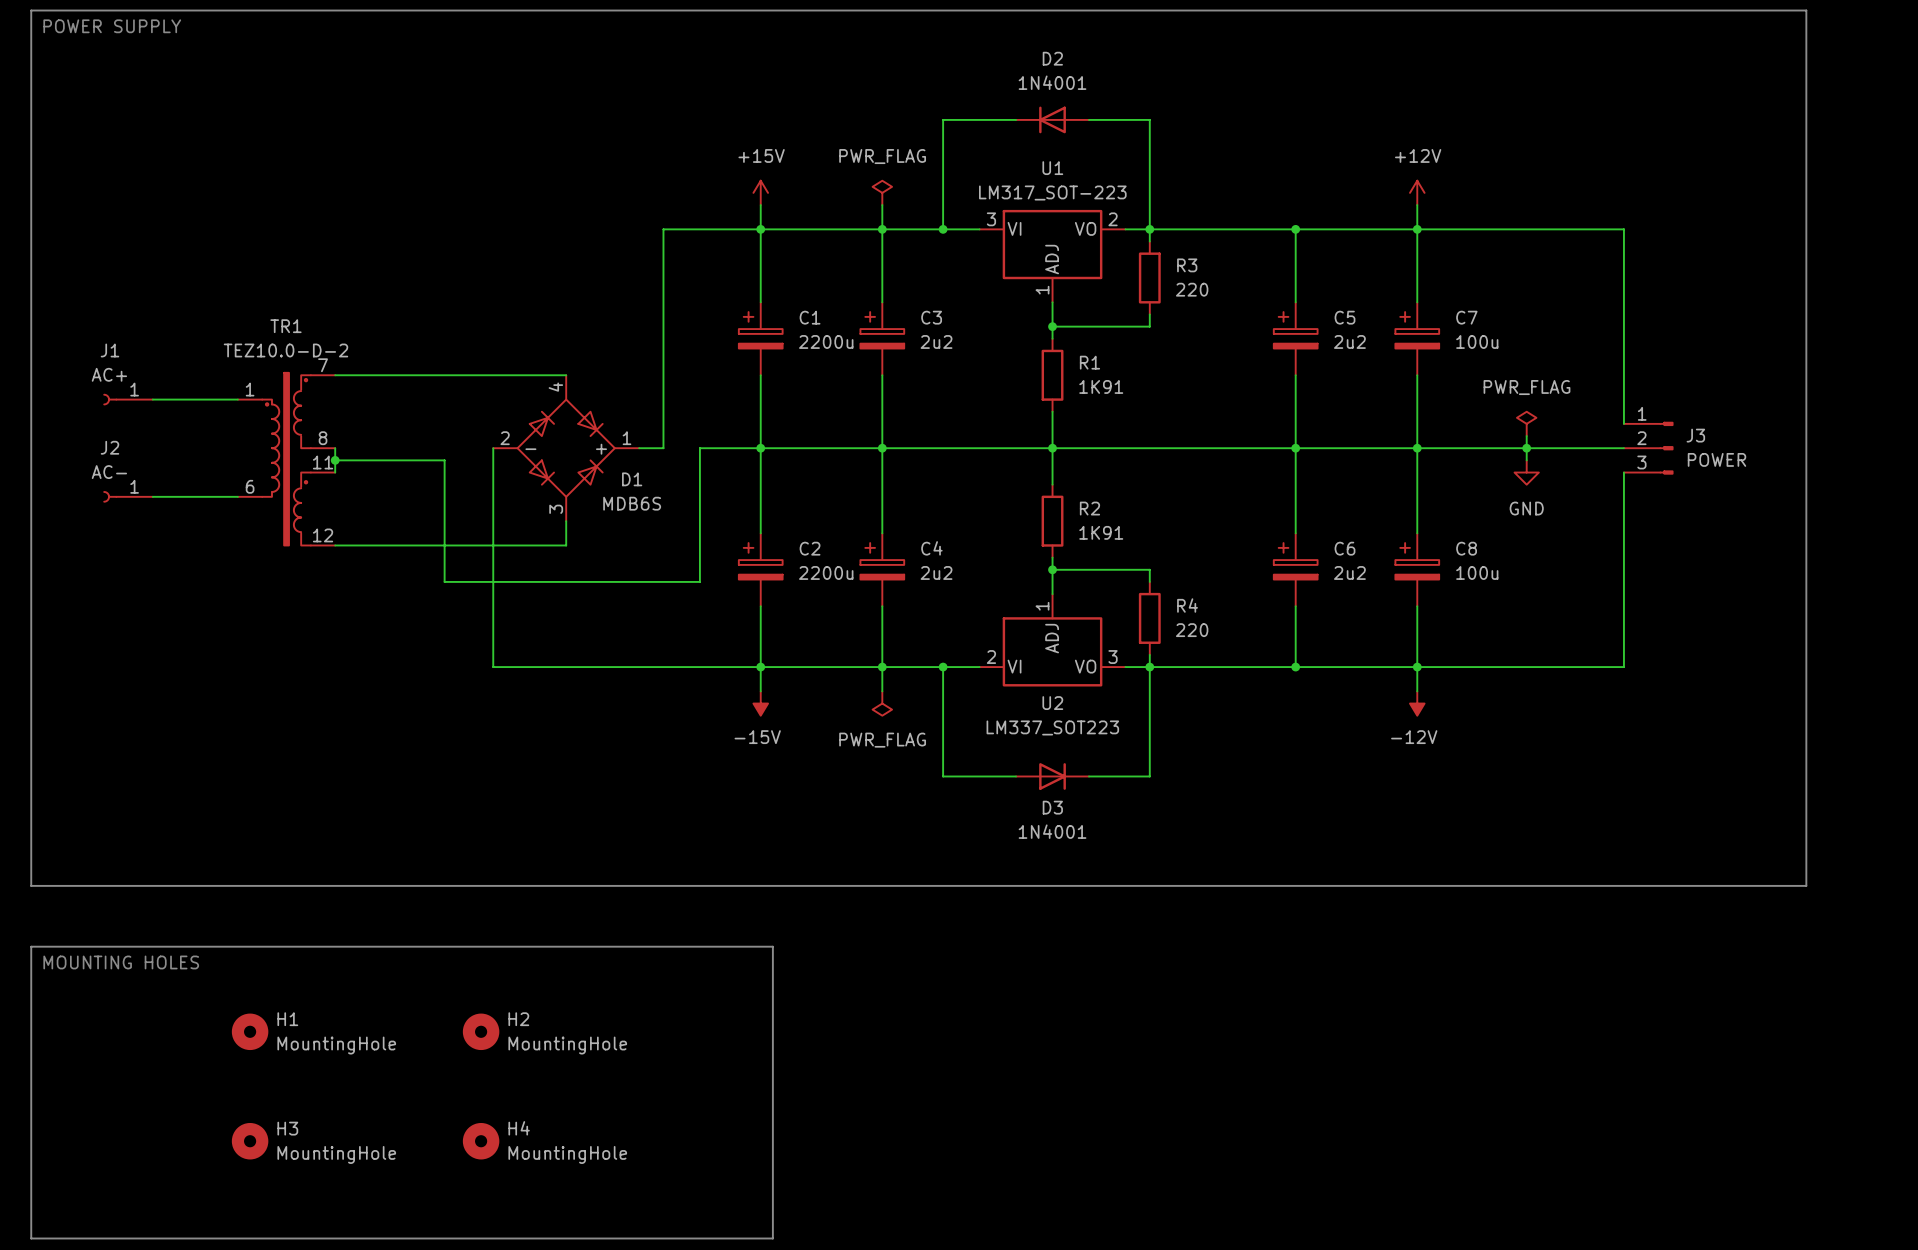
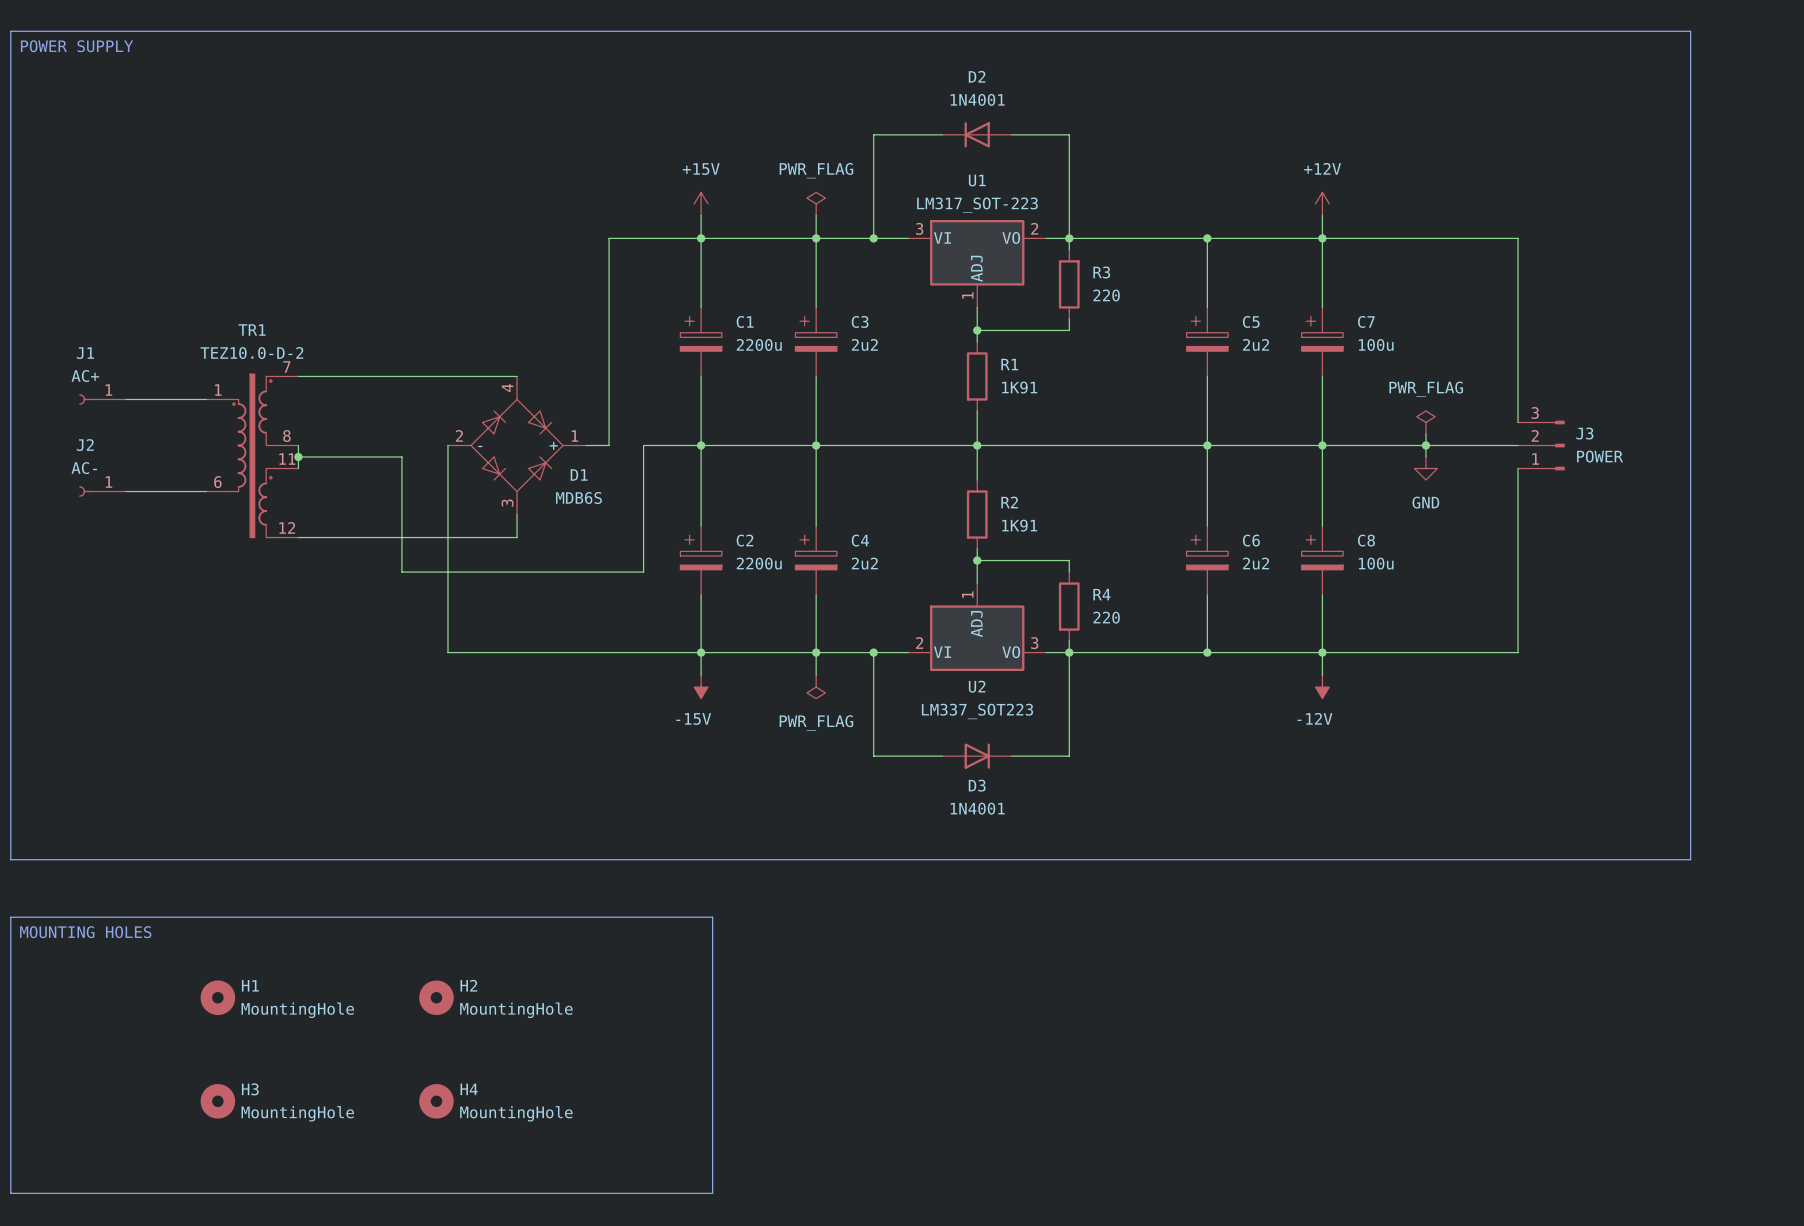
J3 flip: as is (1666, 448) -> up-down (1558, 445)

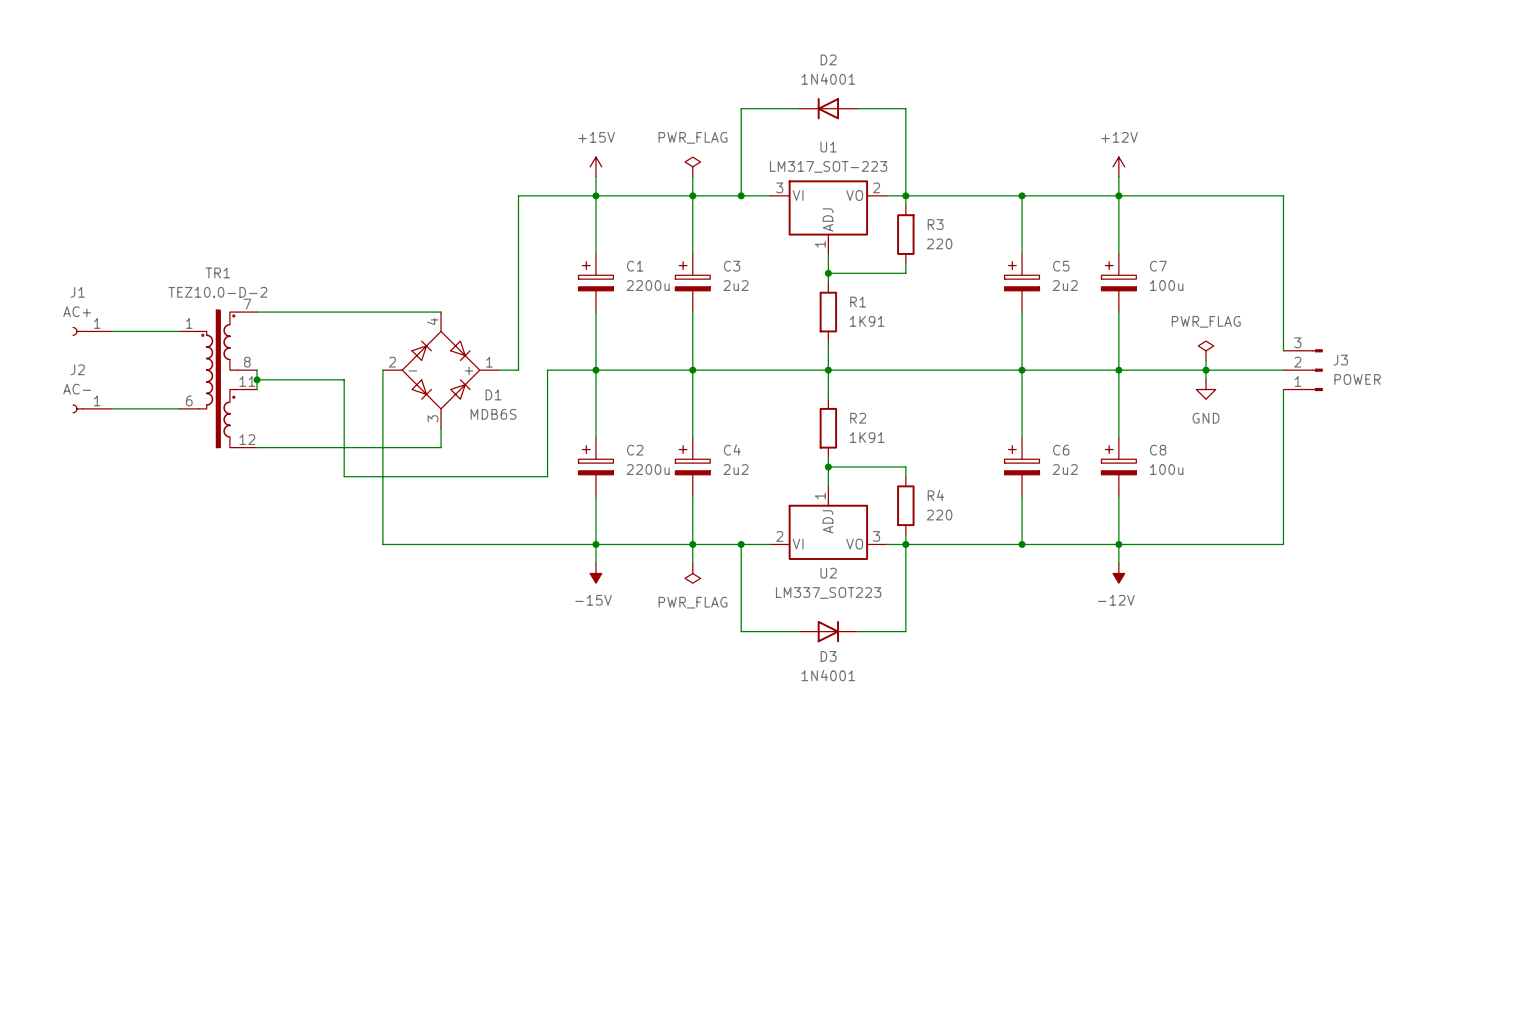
line: (10, 31) (1690, 31) (1690, 859) (10, 859) (10, 31) -> none
text: POWER SUPPLY (77, 46) -> none
line: (10, 917) (10, 1193) (712, 1193) (712, 917) (10, 917) -> none
text: MOUNTING HOLES (85, 932) -> none
H1: MountingHole (217, 997) -> none
H2: MountingHole (436, 997) -> none
H3: MountingHole (217, 1101) -> none
H4: MountingHole (436, 1101) -> none

